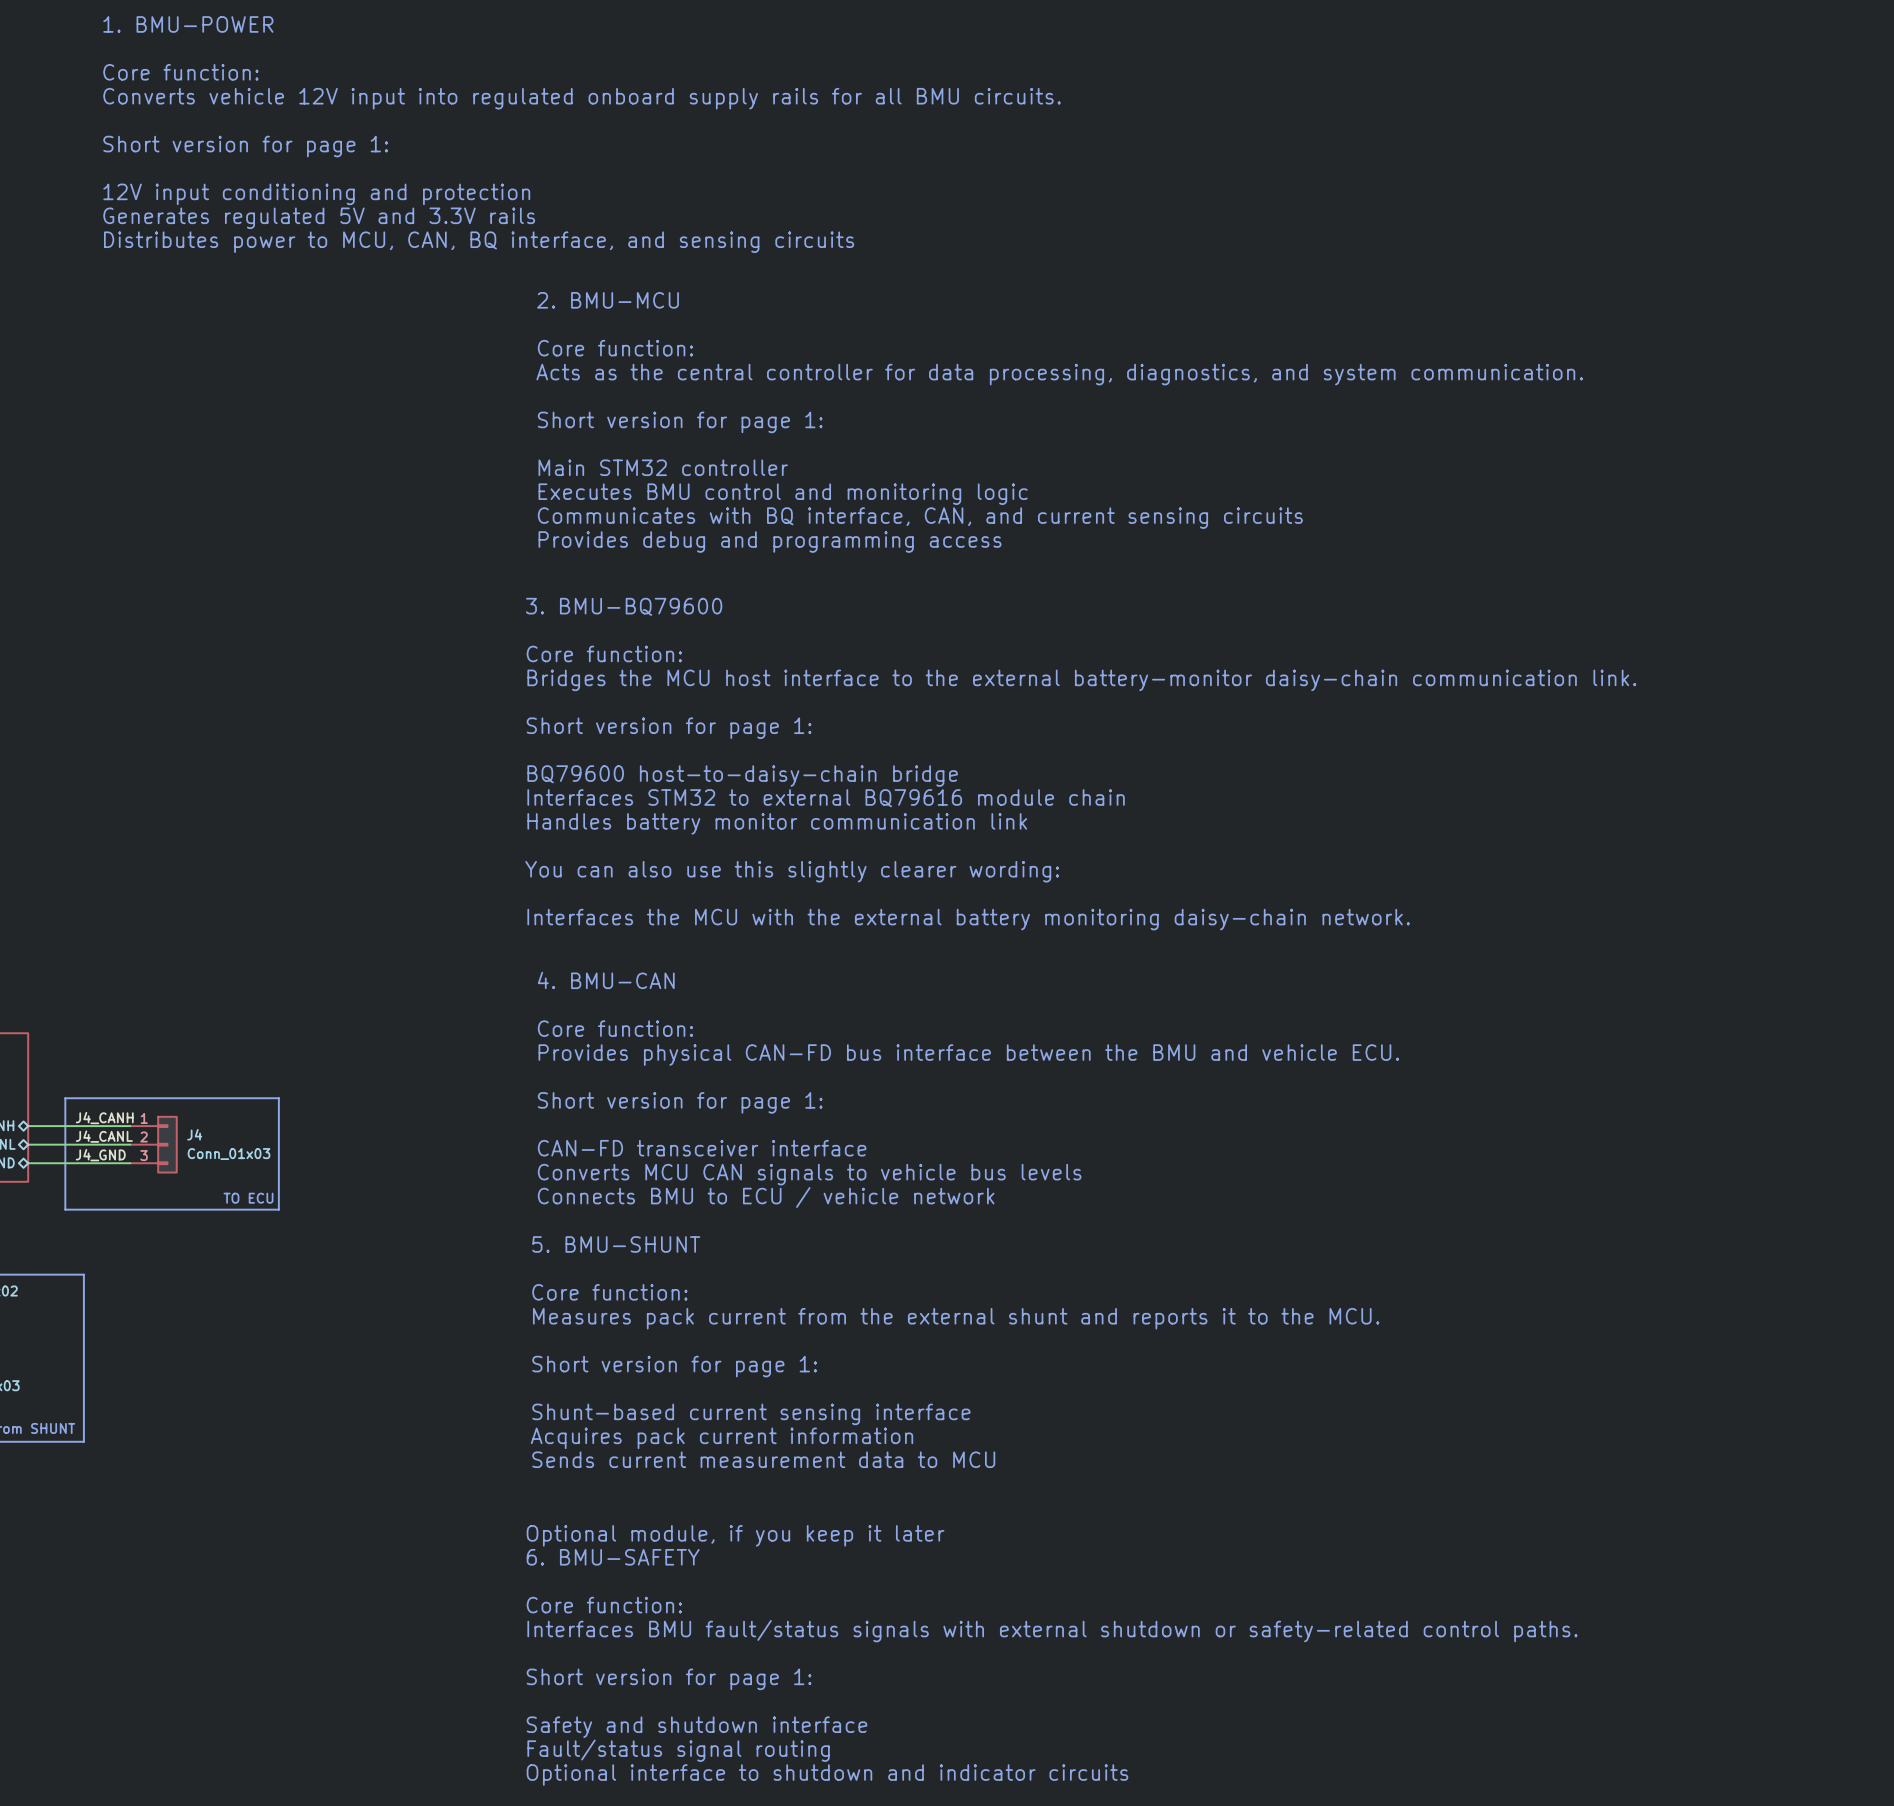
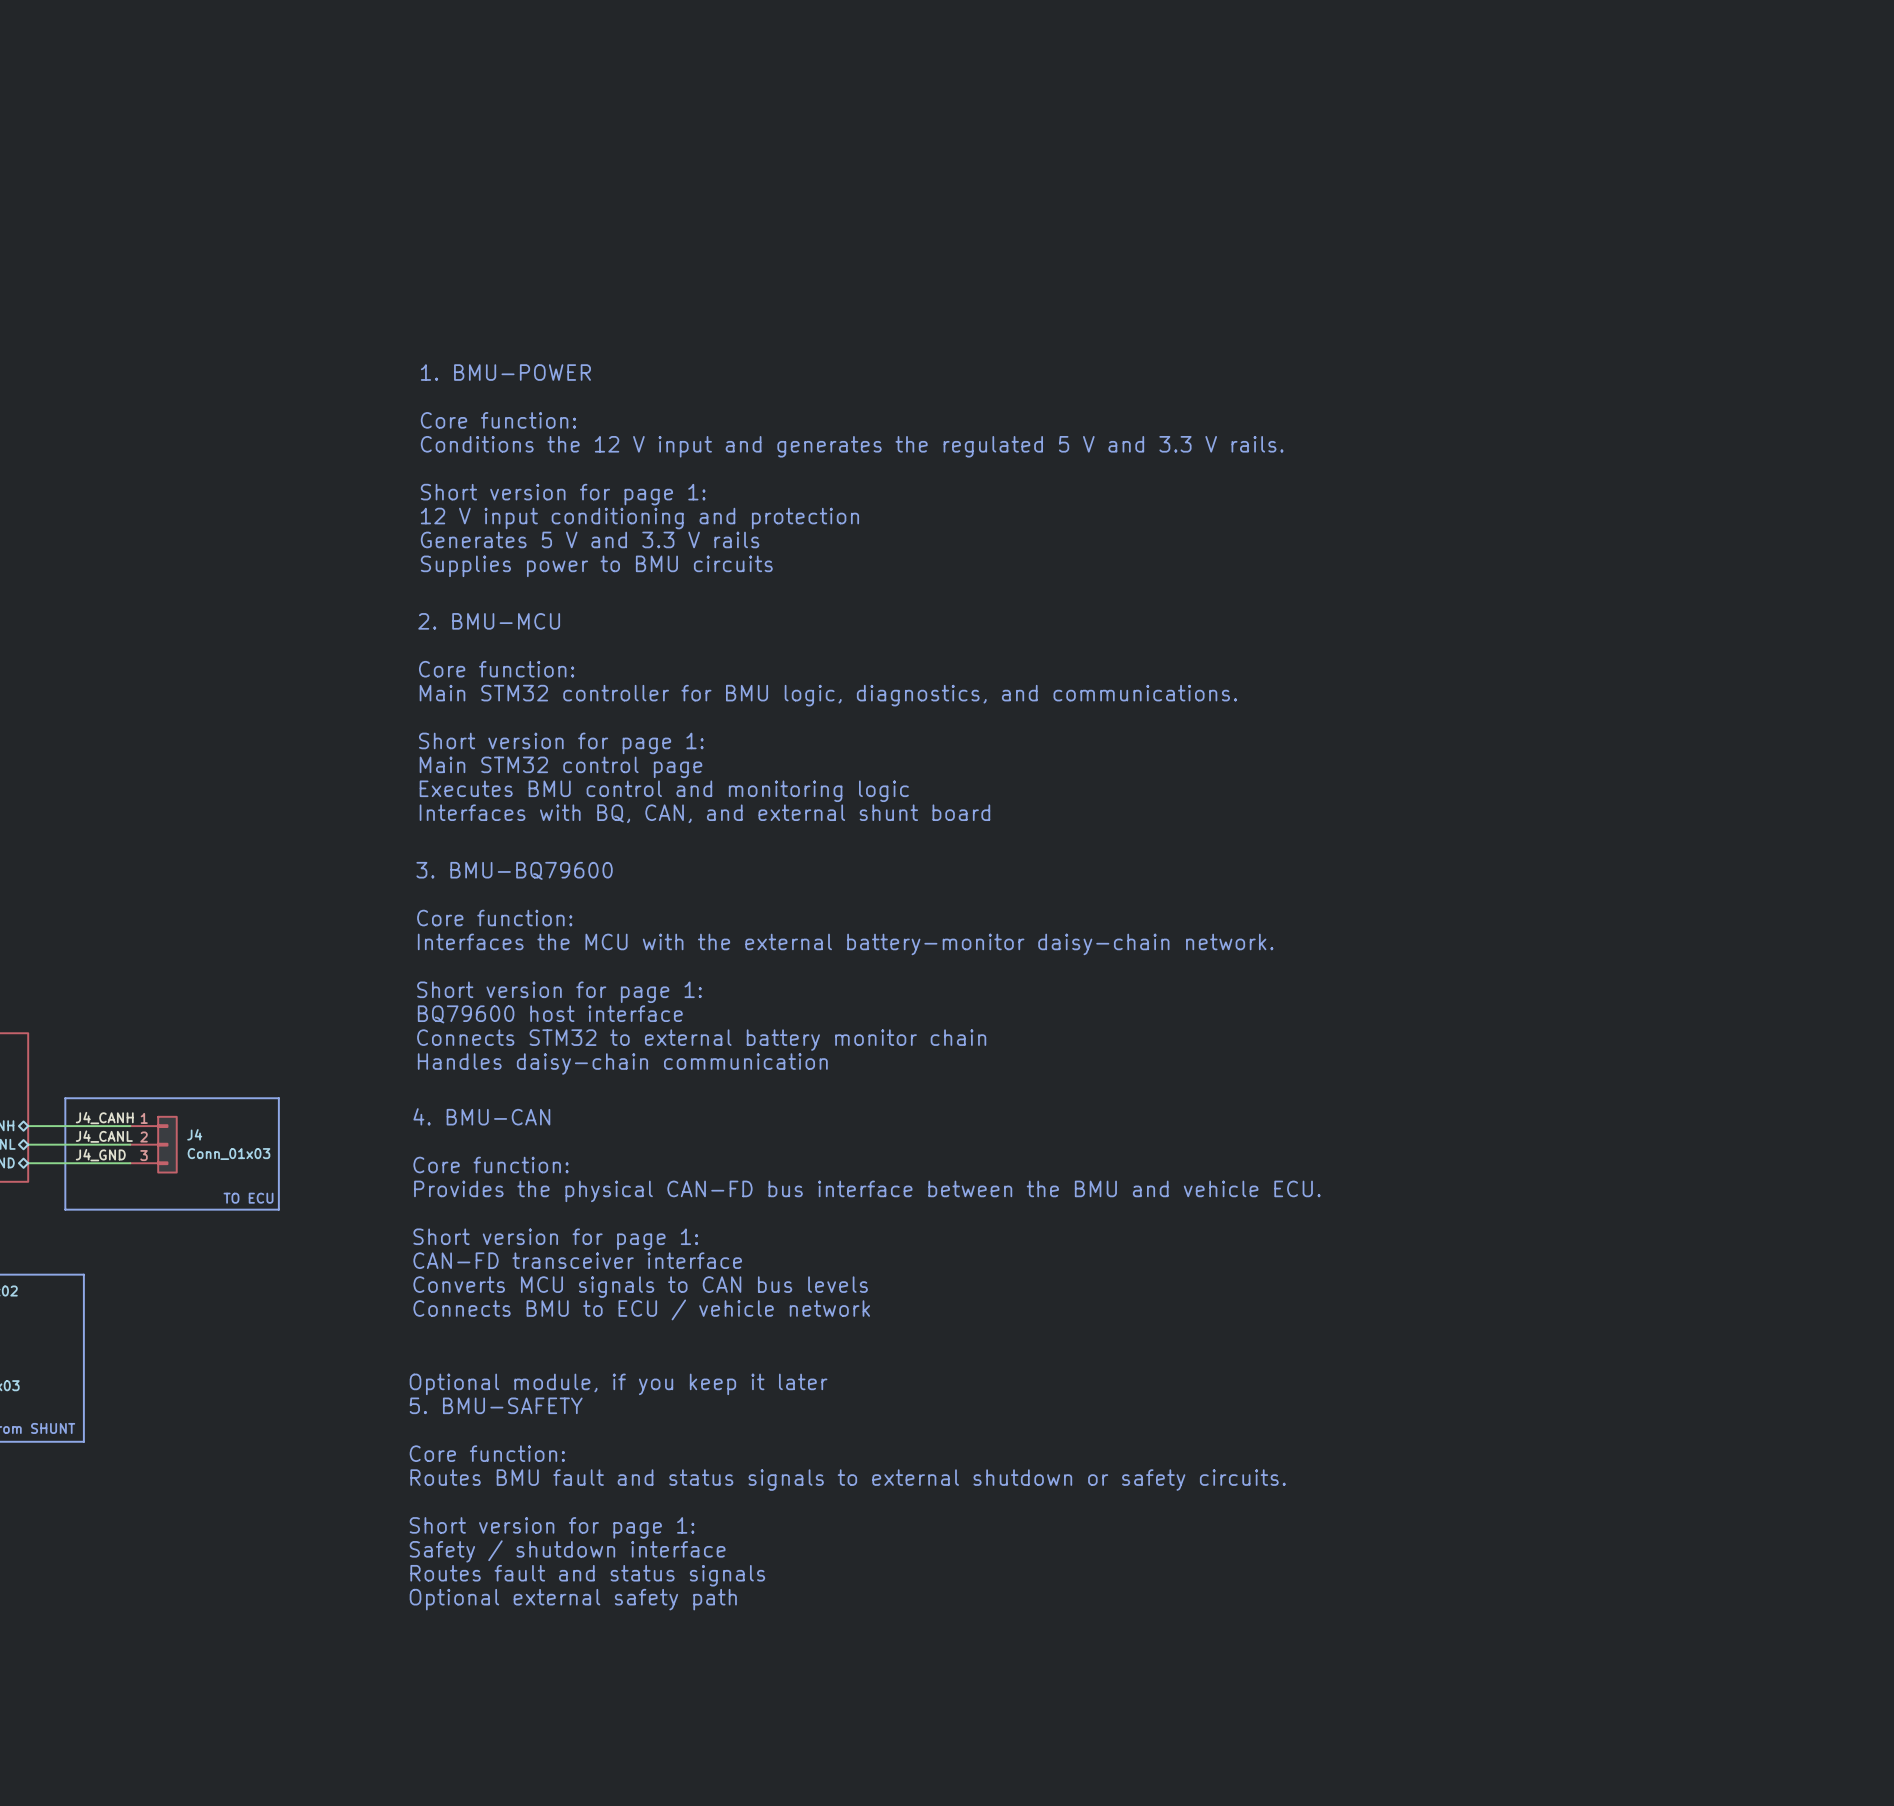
text: 1. BMU-POWER (188, 24) -> none
text: Core function: (180, 72) -> none
text: Converts vehicle 12V input into regulated onboard supply rails for all BMU circuits. (582, 98) -> none
text: Short version for page 1: (245, 146) -> none
text: 12V input conditioning and protection (316, 194) -> none
text: Generates regulated 5V and 3.3V rails (319, 218) -> none
text: Distributes power to MCU, CAN, BQ interface, and sensing circuits (479, 242) -> none
text: 2. BMU-MCU (608, 300) -> none
text: Core function: (615, 348) -> none
text: none -> 1. BMU-POWER (505, 372)
text: Acts as the central controller for data processing, diagnostics, and system communication. (1059, 374) -> none
text: none -> Core function: (498, 420)
text: Short version for page 1: (680, 422) -> none
text: none -> Conditions the 12 V input and generates the regulated 5 V and 3.3 V rails. (852, 446)
text: Main STM32 controller (663, 467) -> none
text: none -> Short version for page 1: (563, 494)
text: Executes BMU control and monitoring logic (783, 494) -> none
text: none -> 12 V input conditioning and protection (639, 518)
text: Communicates with BQ interface, CAN, and current sensing circuits (920, 518) -> none
text: none -> Generates 5 V and 3.3 V rails (590, 539)
text: Provides debug and programming access (770, 541) -> none
text: none -> Supplies power to BMU circuits (596, 566)
text: 3. BMU-BQ79600 (624, 606) -> none
text: none -> 2. BMU-MCU (489, 621)
text position: Core function: (604, 653) -> Core function: (496, 669)
text: Bridges the MCU host interface to the external battery-monitor daisy-chain communication link. (1081, 680) -> none
text: none -> Main STM32 controller for BMU logic, diagnostics, and communications. (828, 695)
text position: Short version for page 1: (669, 728) -> Short version for page 1: (561, 743)
text: none -> Main STM32 control page (560, 767)
text: BQ79600 host-to-daisy-chain bridge (742, 776) -> none
text: none -> Executes BMU control and monitoring logic (664, 791)
text: Interfaces STM32 to external BQ79616 module chain (826, 798) -> none
text: none -> Interfaces with BQ, CAN, and external shunt board (704, 813)
text: Handles battery monitor communication link (777, 823) -> none
text: none -> 3. BMU-BQ79600 (514, 870)
text: You can also use this slightly clearer wording: (792, 871) -> none
text: none -> Core function: (494, 918)
text: Interfaces the MCU with the external battery monitoring daisy-chain network. (968, 919) -> Interfaces the MCU with the external battery-monitor daisy-chain network. (845, 944)
text: 4. BMU-CAN (606, 980) -> none
text: none -> Short version for page 1: (559, 992)
text: none -> BQ79600 host interface (550, 1014)
text: Core function: (615, 1028) -> none
text: none -> Connects STM32 to external battery monitor chain (701, 1040)
text: Provides physical CAN-FD bus interface between the BMU and vehicle ECU. (968, 1055) -> none
text: none -> Handles daisy-chain communication (622, 1064)
text: Short version for page 1: (680, 1102) -> none
text: none -> 4. BMU-CAN (481, 1116)
text position: CAN-FD transceiver interface (702, 1148) -> CAN-FD transceiver interface (577, 1260)
text: none -> Core function: (491, 1165)
text: Converts MCU CAN signals to vehicle bus levels (809, 1174) -> none
text: none -> Provides the physical CAN-FD bus interface between the BMU and vehicle ECU. (867, 1191)
text position: Connects BMU to ECU / vehicle network (766, 1197) -> Connects BMU to ECU / vehicle network (641, 1309)
text: none -> Short version for page 1: (555, 1239)
text: 5. BMU-SHUNT (616, 1244) -> none
text: none -> Converts MCU signals to CAN bus levels (640, 1287)
text: Core function: (609, 1292) -> none
text: Measures pack current from the external shunt and reports it to the MCU. (956, 1318) -> none
text: Short version for page 1: (674, 1366) -> none
text: none -> Optional module, if you keep it later (618, 1384)
text: none -> 5. BMU-SAFETY (496, 1405)
text: Shunt-based current sensing interface (751, 1414) -> none
text: Acquires pack current information (722, 1438) -> none
text: none -> Core function: (487, 1453)
text: Sends current measurement data to MCU (763, 1459) -> none
text: none -> Routes BMU fault and status signals to external shutdown or safety circuits. (848, 1480)
text: none -> Short version for page 1: (552, 1527)
text: Optional module, if you keep it later (735, 1535) -> none
text: none -> Safety / shutdown interface (567, 1551)
text: 6. BMU-SAFETY (613, 1557) -> none
text: none -> Routes fault and status signals (587, 1575)
text: none -> Optional external safety path (573, 1599)
text: Core function: (604, 1605) -> none
text: Interfaces BMU fault/status signals with external shutdown or safety-related control paths. (1052, 1631) -> none
text: Short version for page 1: (669, 1679) -> none
text: Safety and shutdown interface (696, 1727) -> none
text: Fault/status signal routing (678, 1750) -> none
text: Optional interface to shutdown and indicator circuits (827, 1775) -> none

